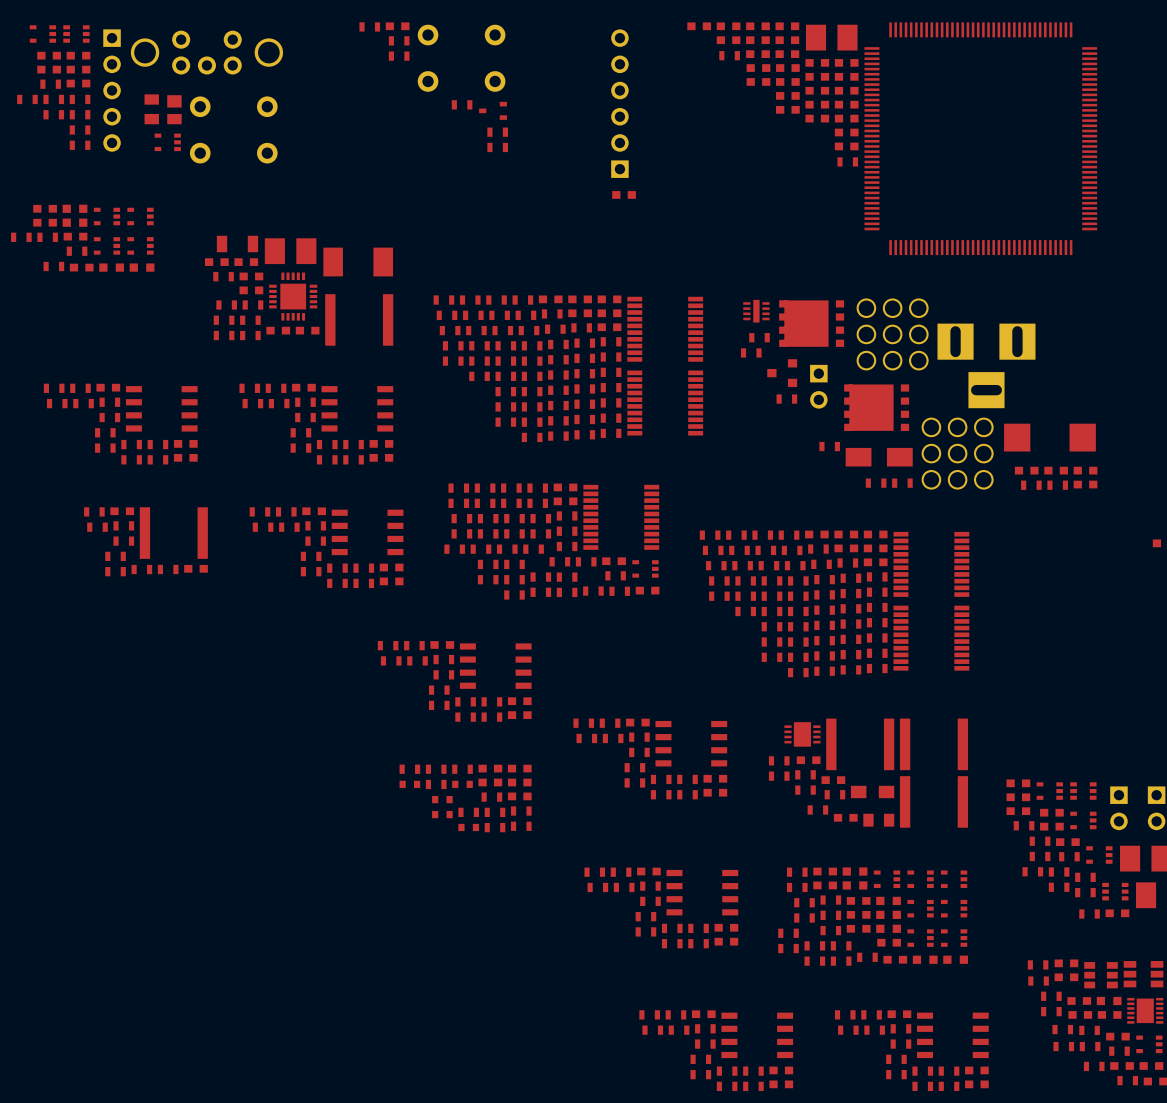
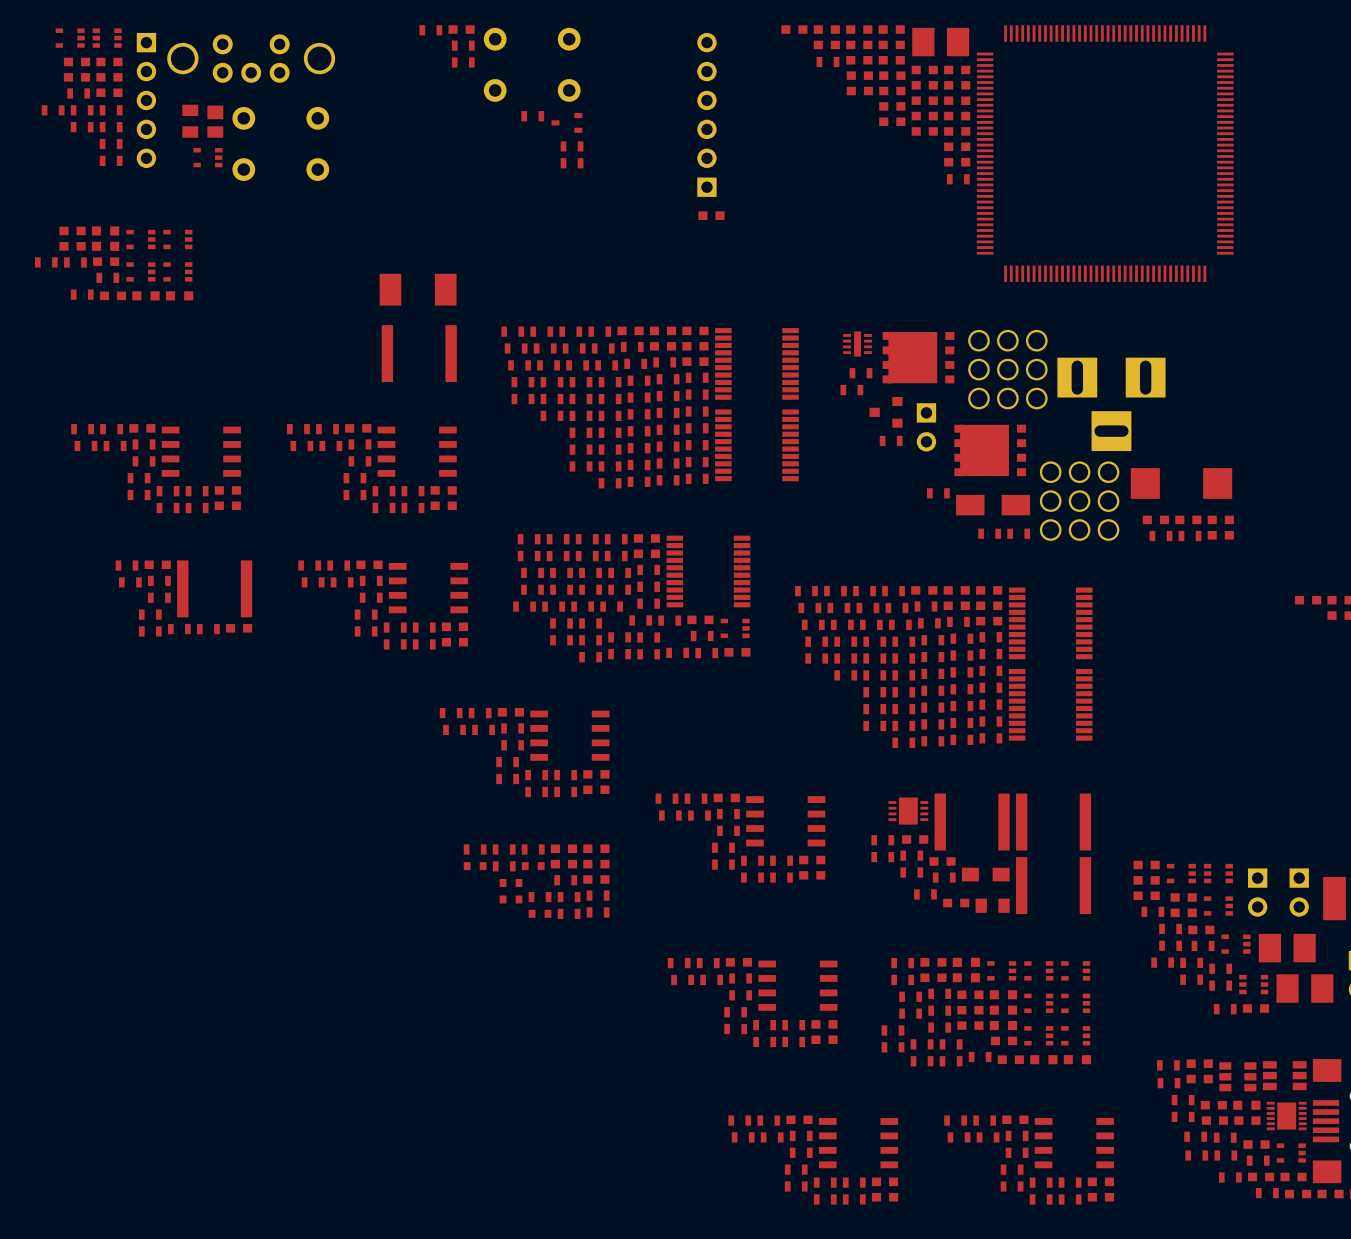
part: (237, 244) -> none
part: (290, 251) -> none
part: (216, 262) -> none
part: (246, 262) -> none
part: (223, 276) -> none
part: (251, 276) -> none
part: (251, 290) -> none
part: (293, 296) -> none
part: (226, 304) -> none
part: (252, 304) -> none
part: (224, 320) -> none
part: (250, 320) -> none
part: (278, 330) -> none
part: (307, 330) -> none
part: (224, 335) -> none
part: (250, 335) -> none

